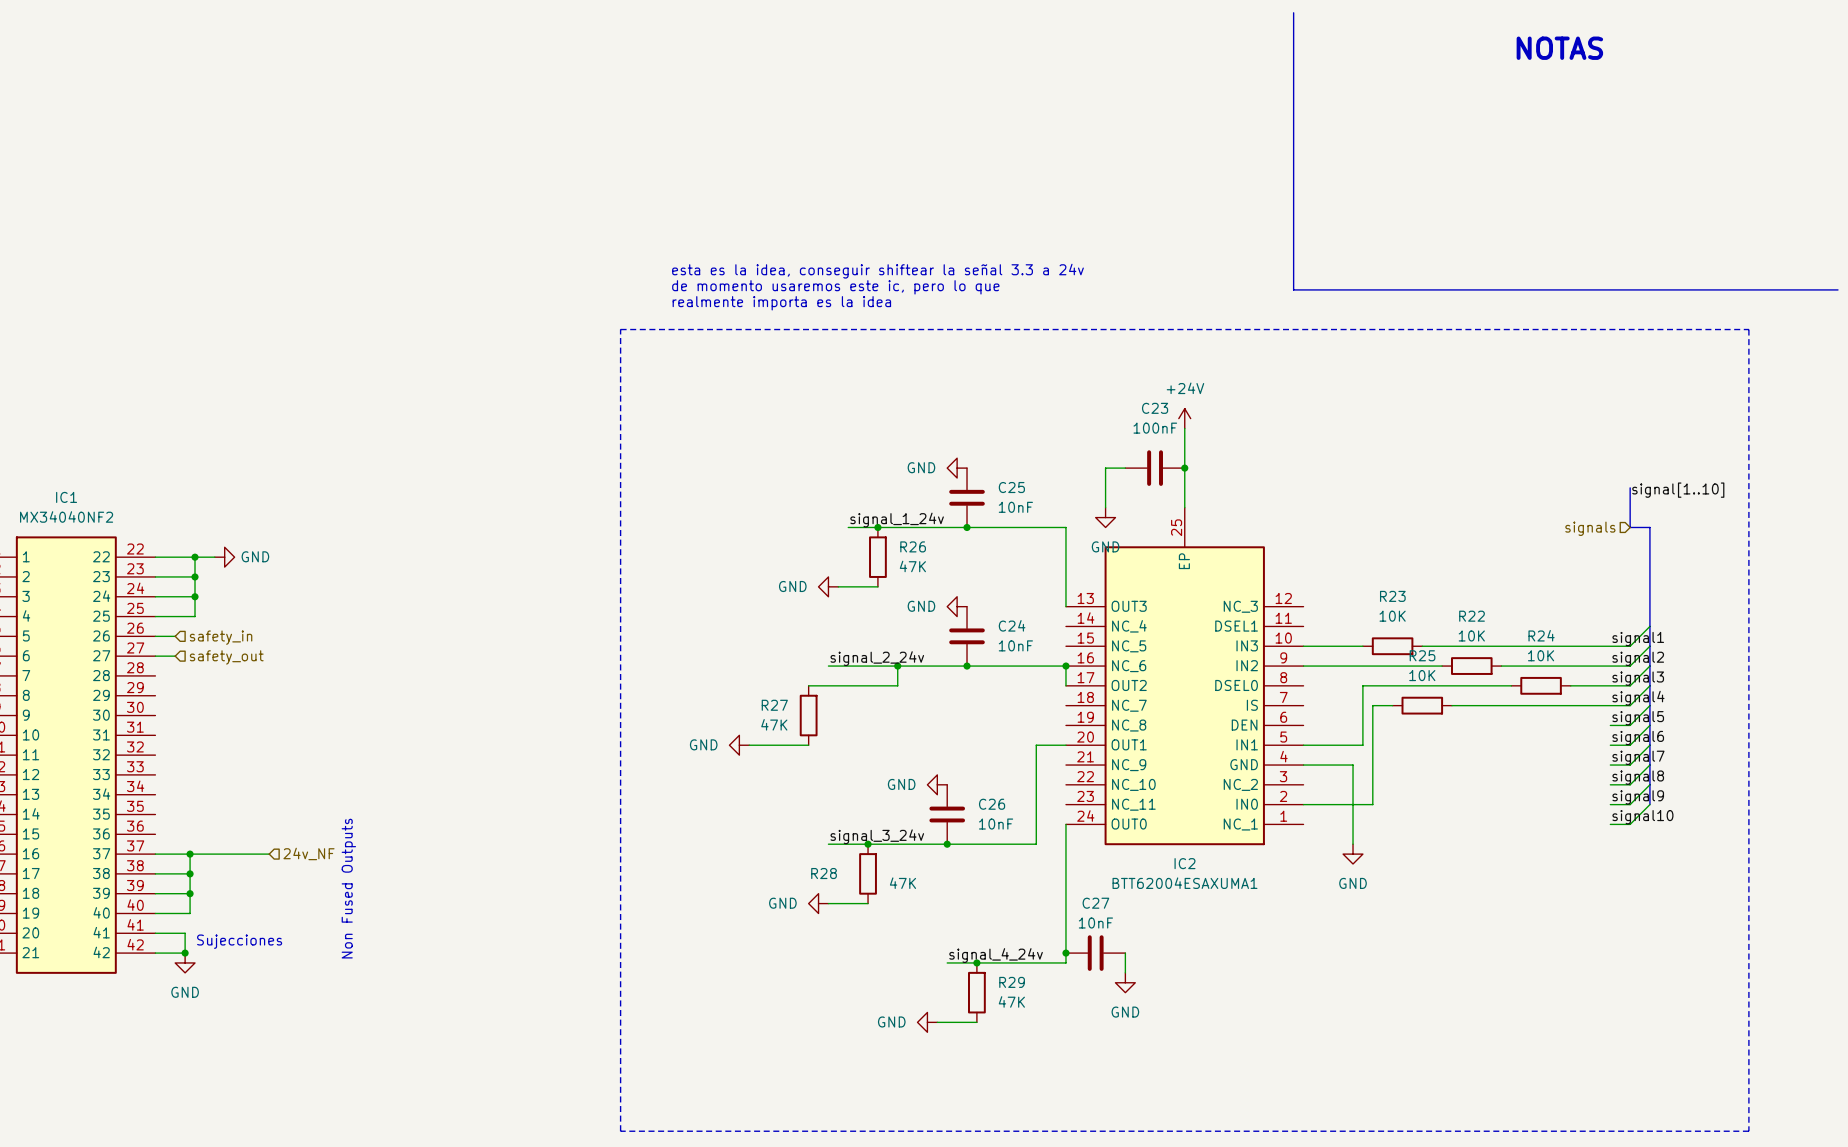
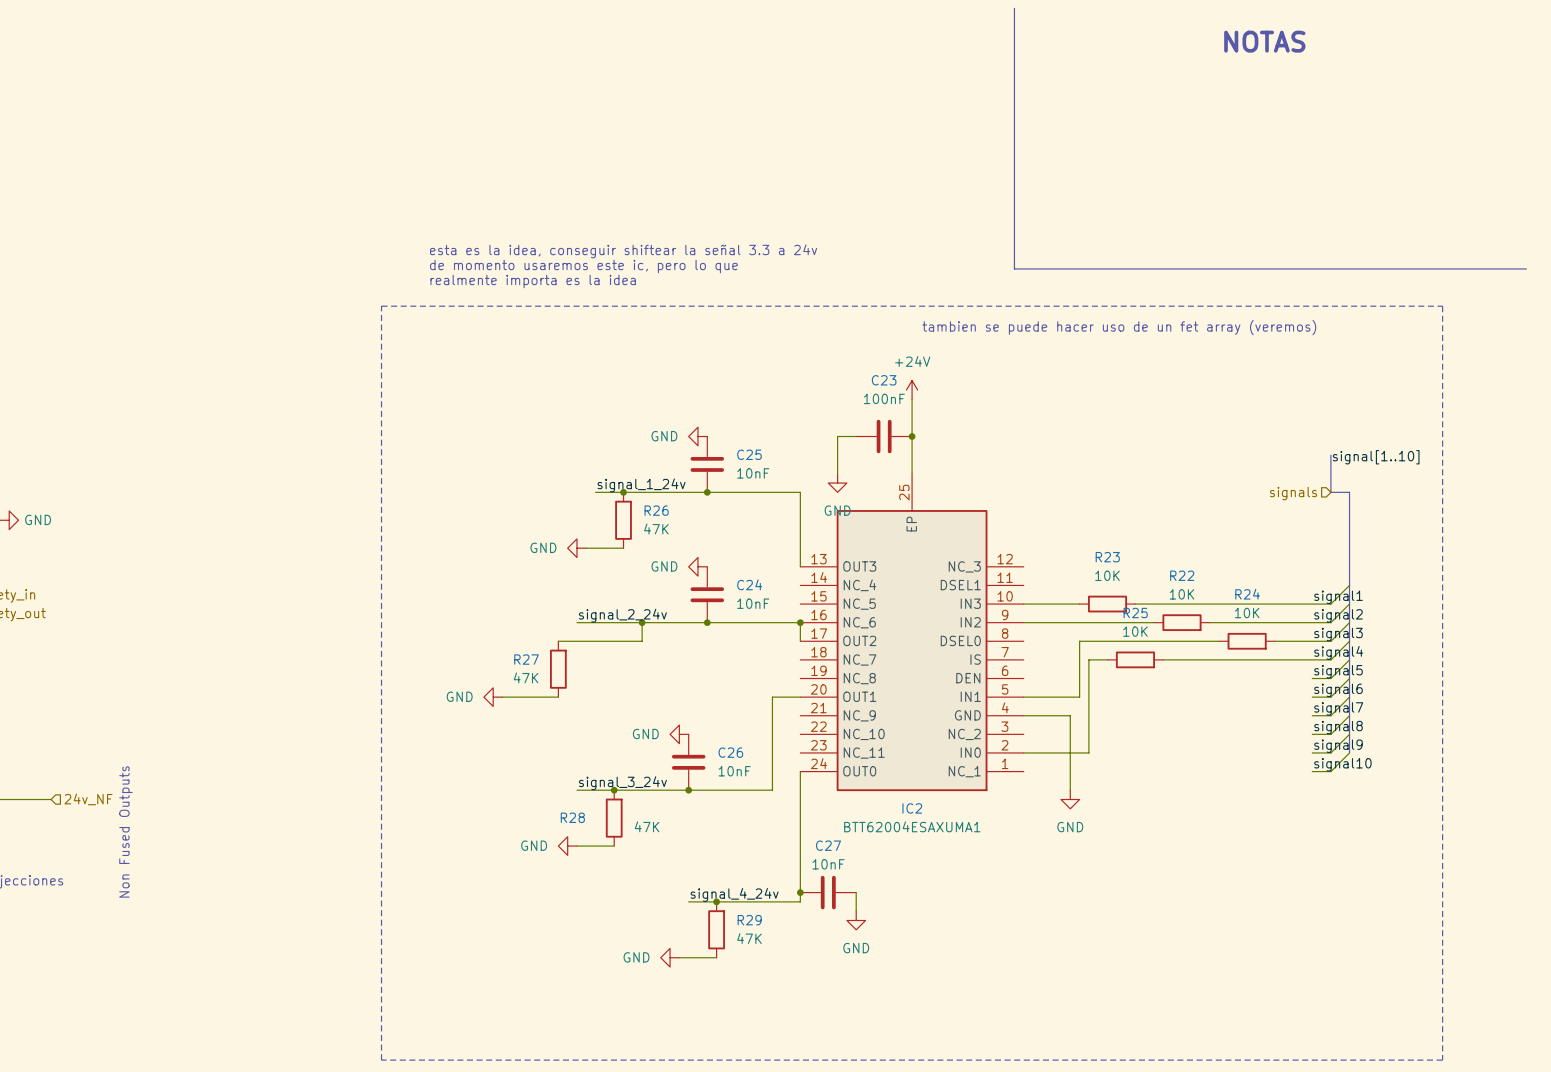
text: none -> tambien se puede hacer uso de un fet array (veremos) (1119, 327)

